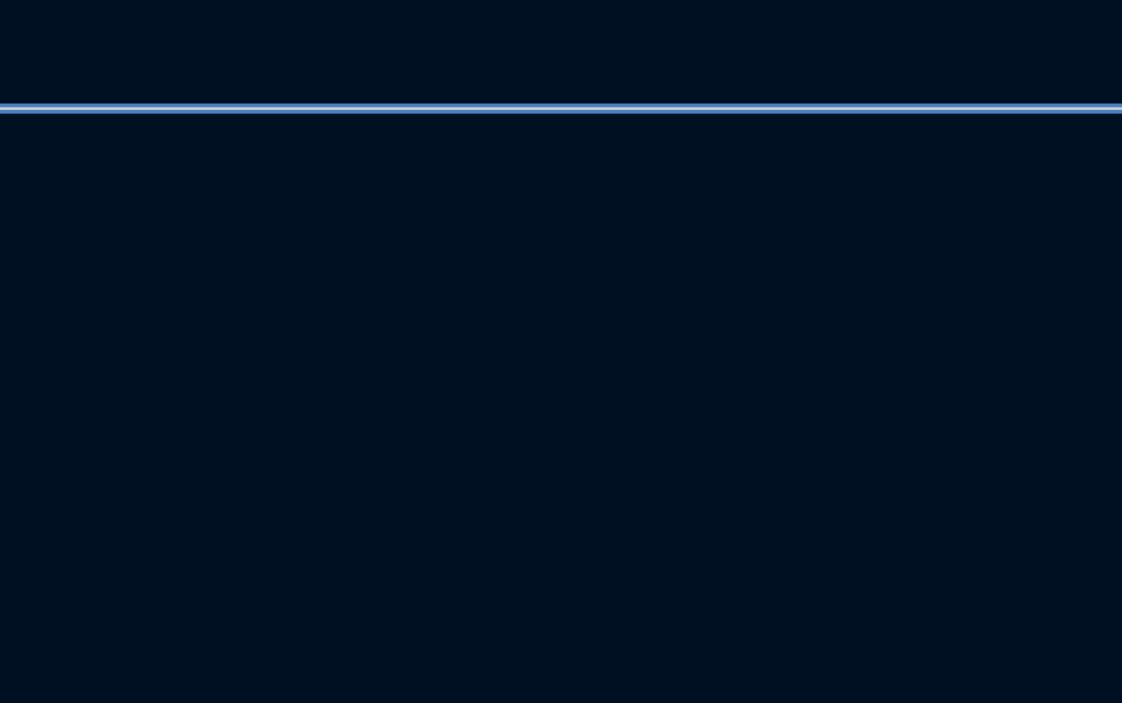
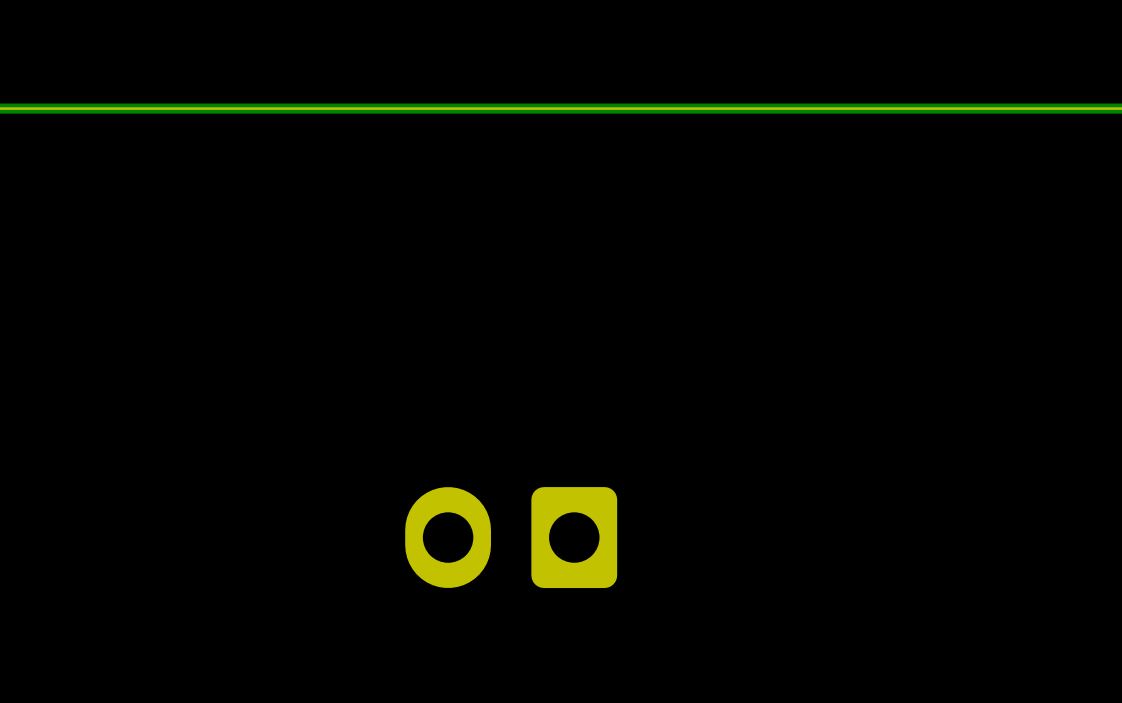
part: none -> (511, 537)

